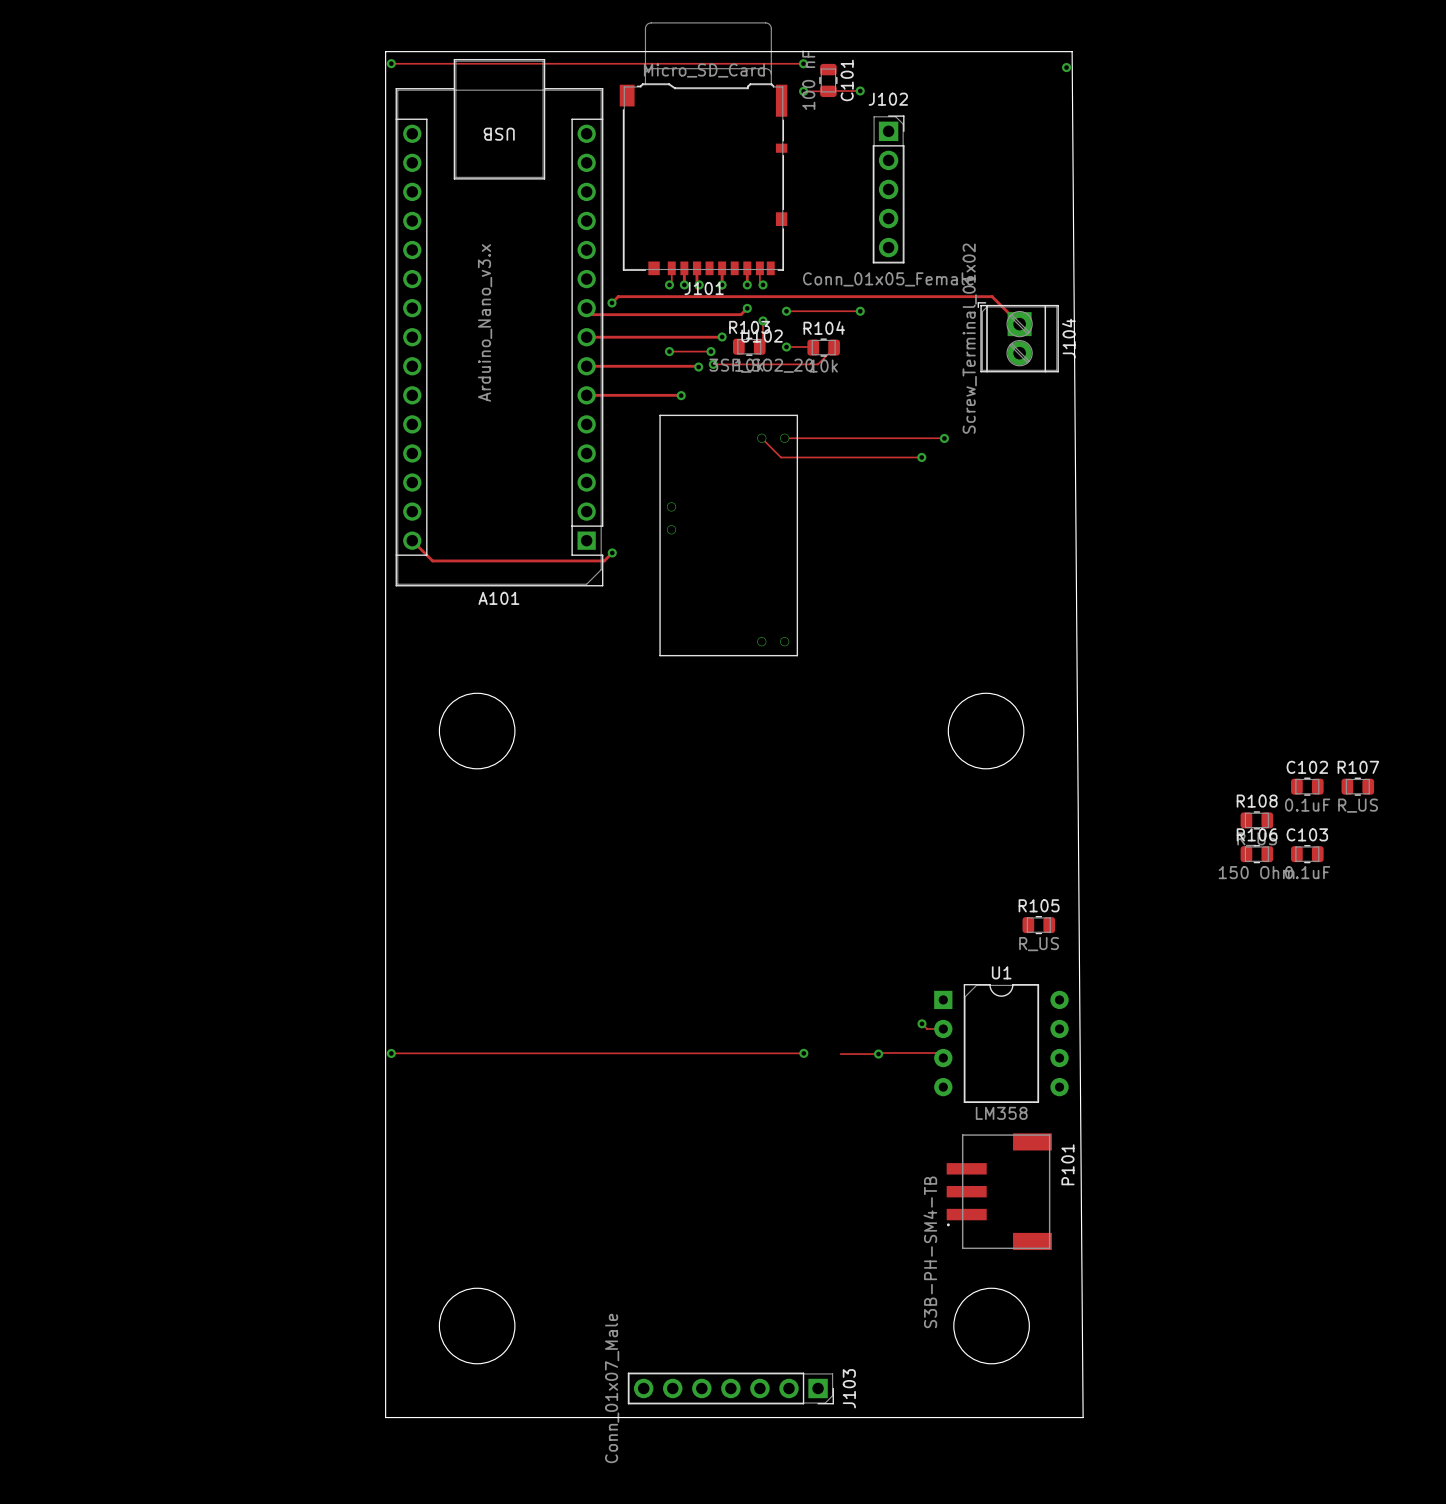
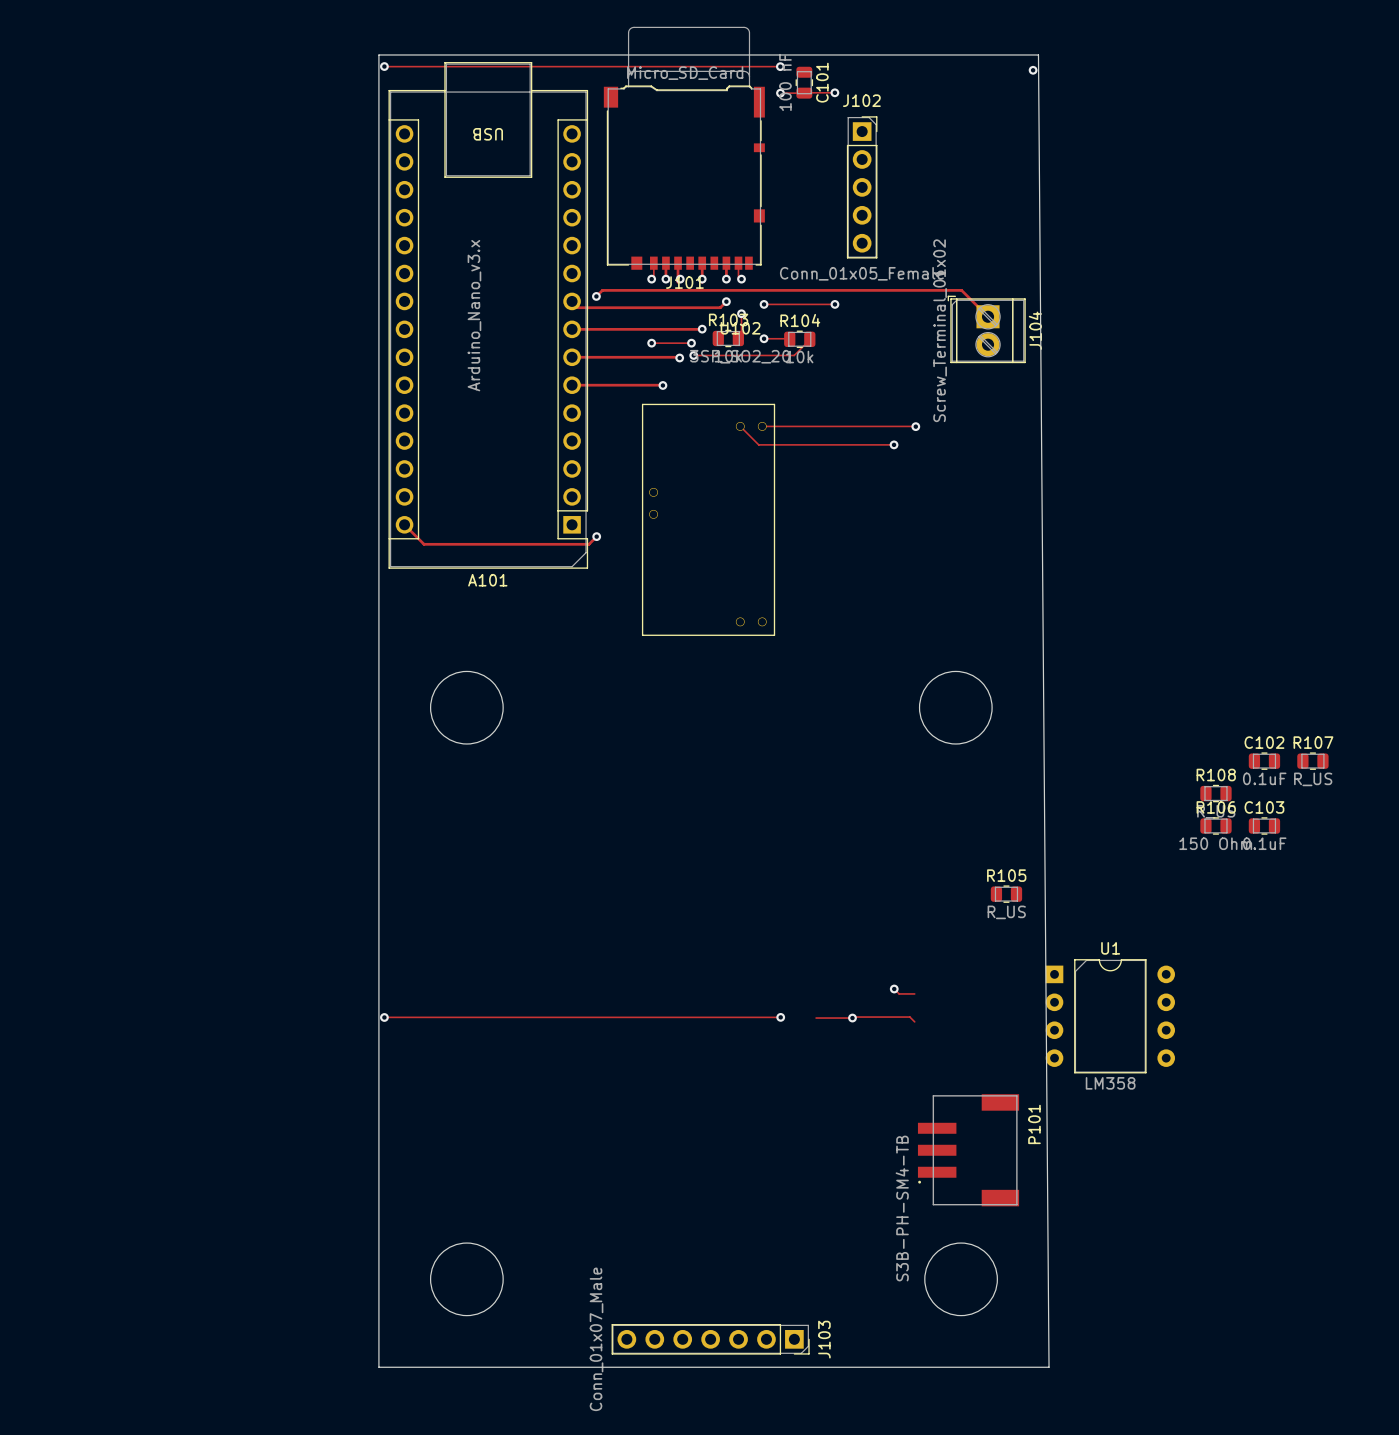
U1 position: (1001, 1043) -> (1110, 1016)

